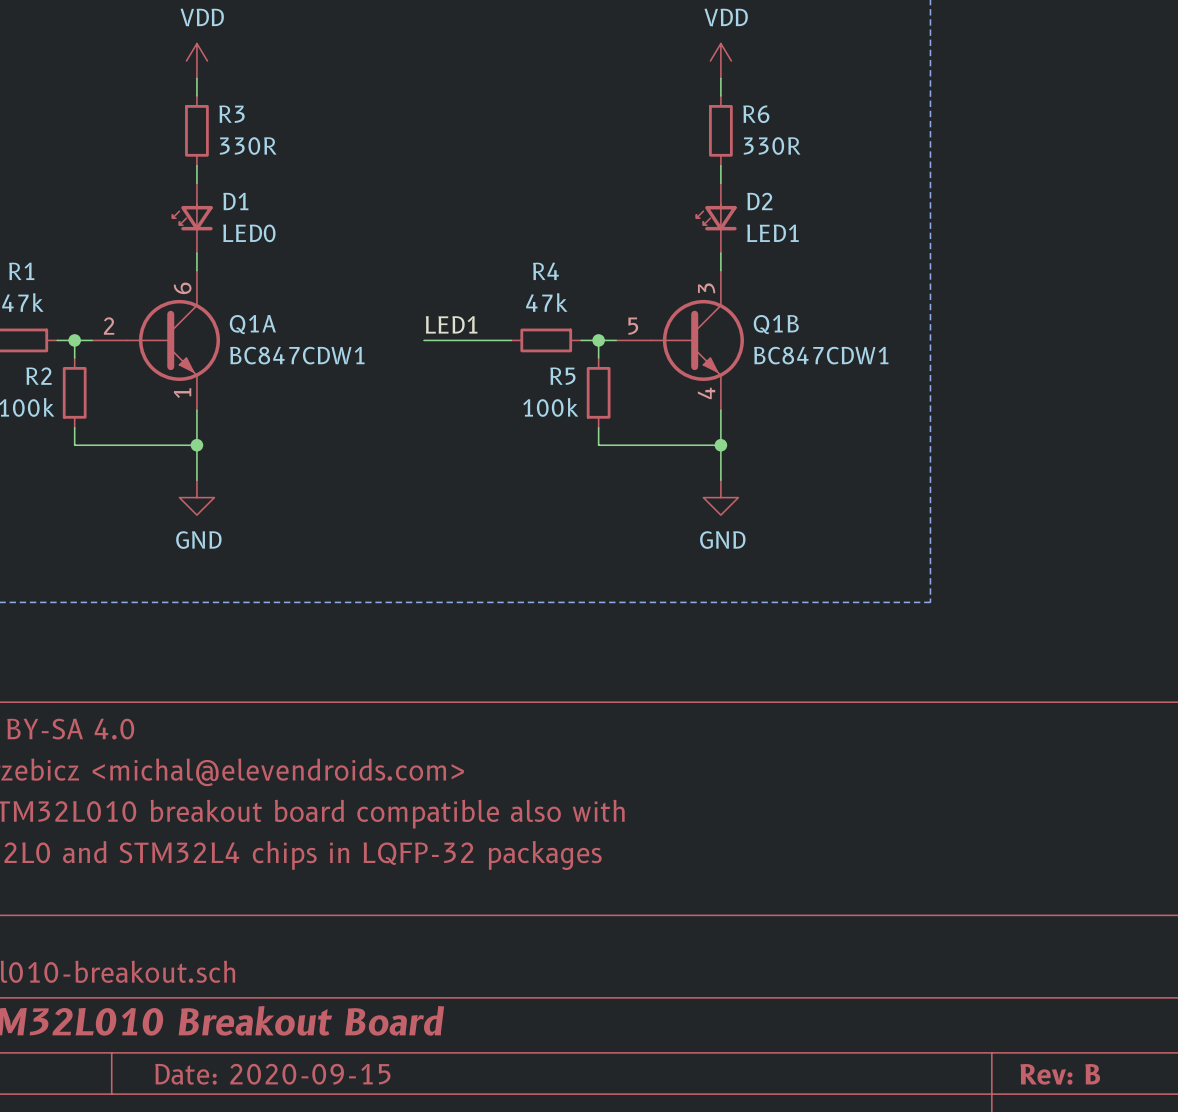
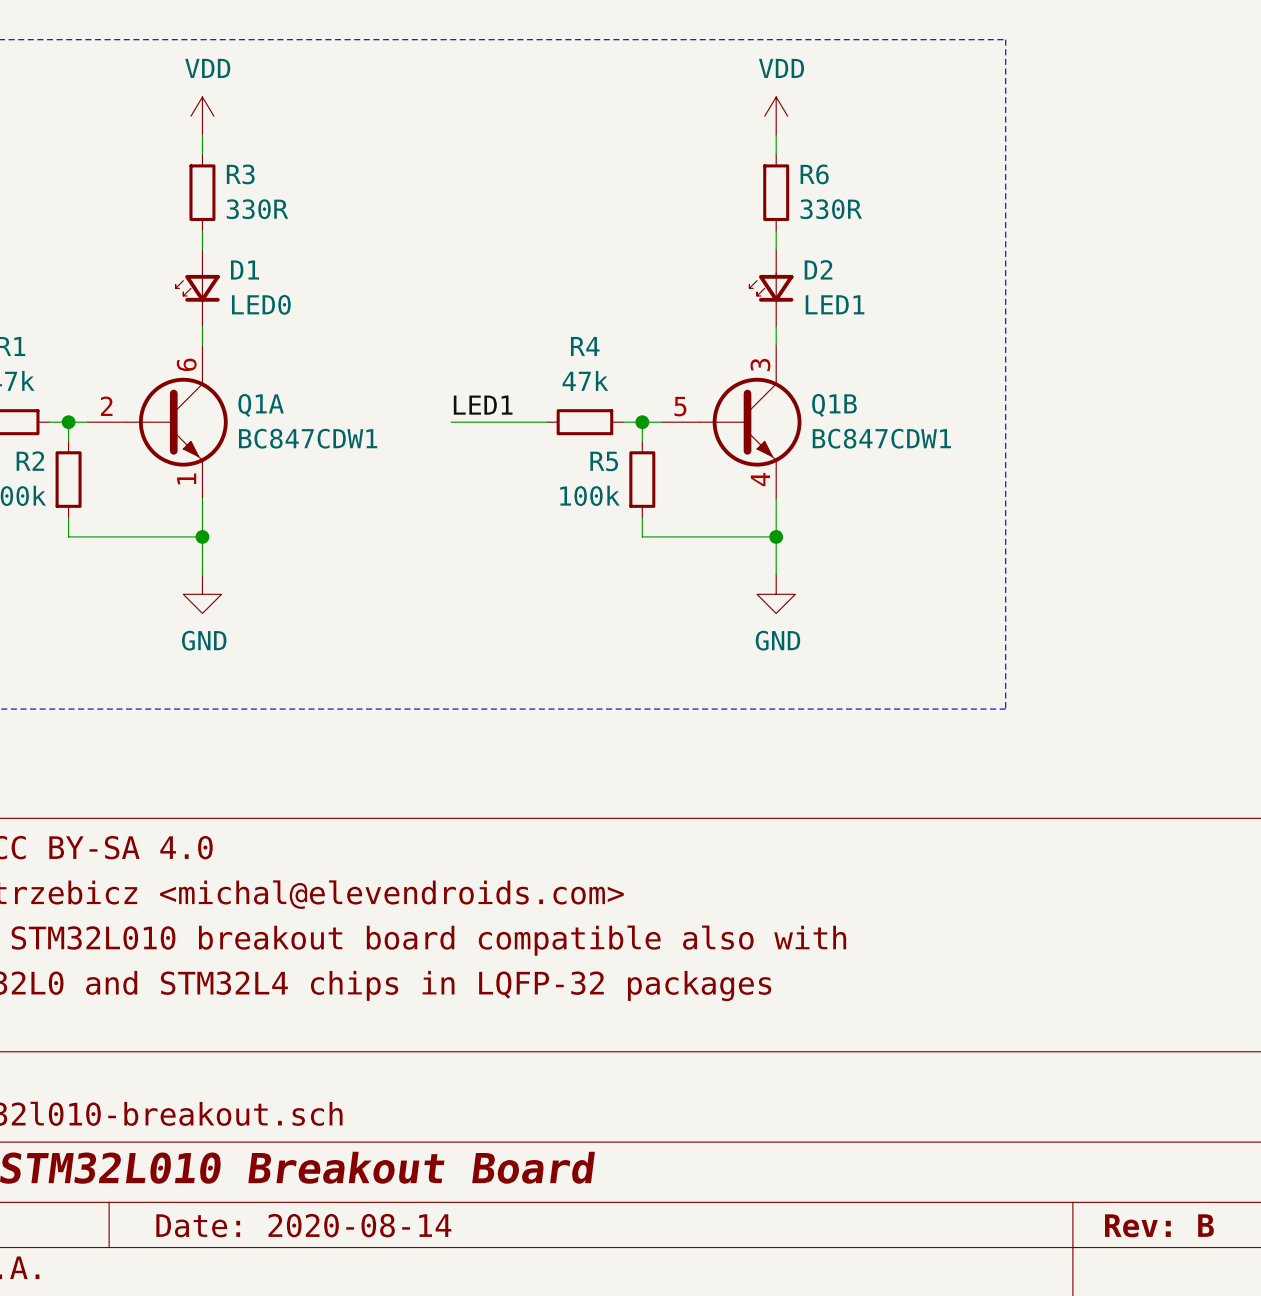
title block: Date: 2020-09-15 (272, 1074) -> Date: 2020-08-14 (303, 1225)

